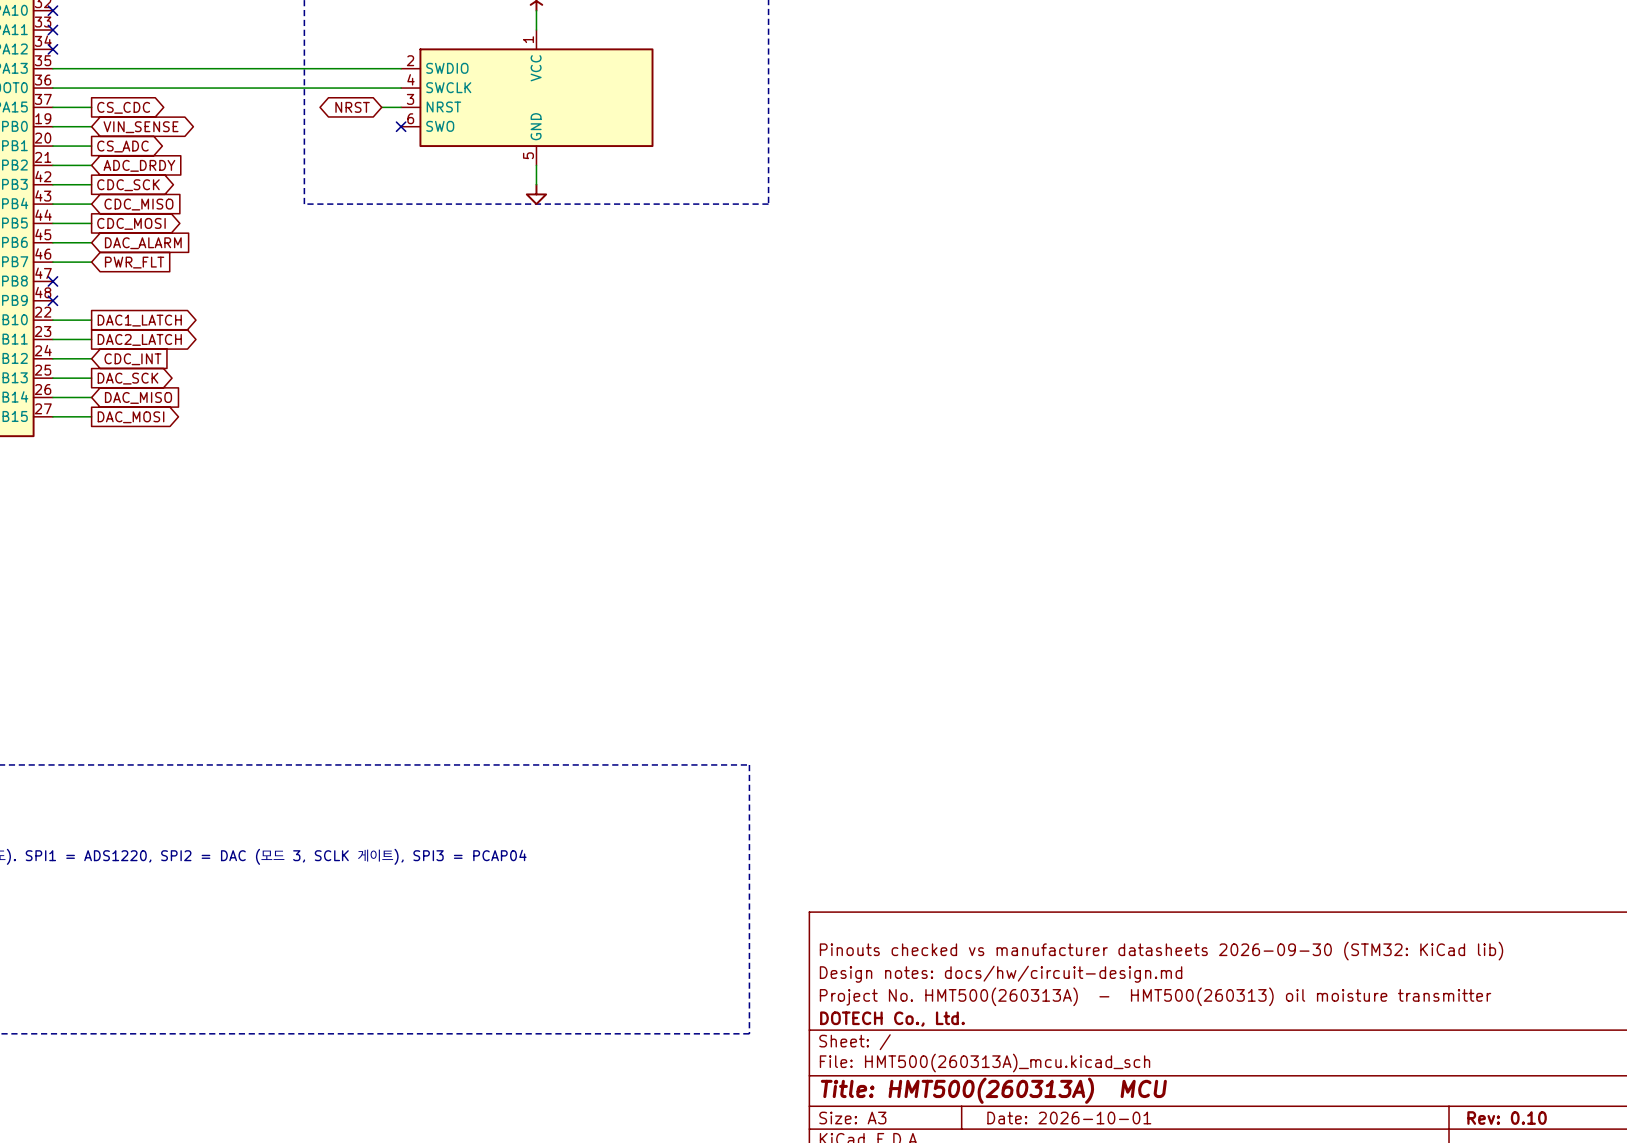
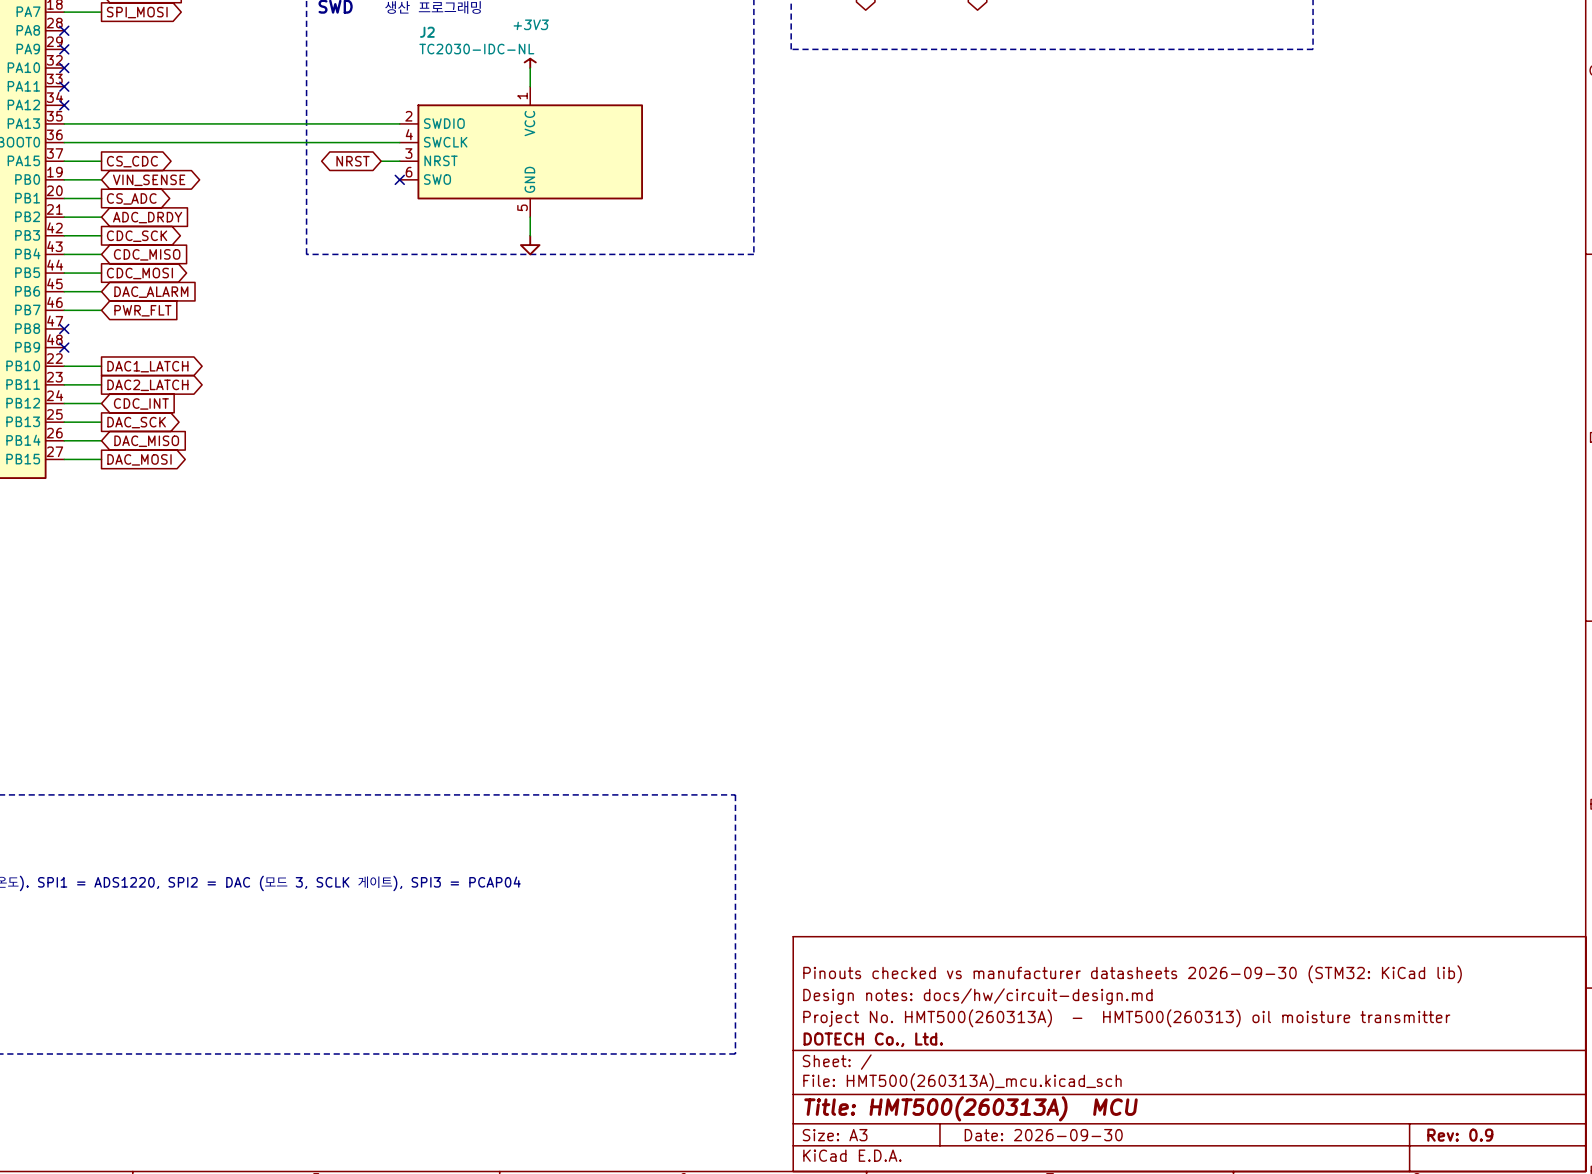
title block: Date: 2026-10-01 (1069, 1118) -> Date: 2026-09-30 (1043, 1135)
title block: Rev: 0.10 (1507, 1118) -> Rev: 0.9 (1460, 1135)

